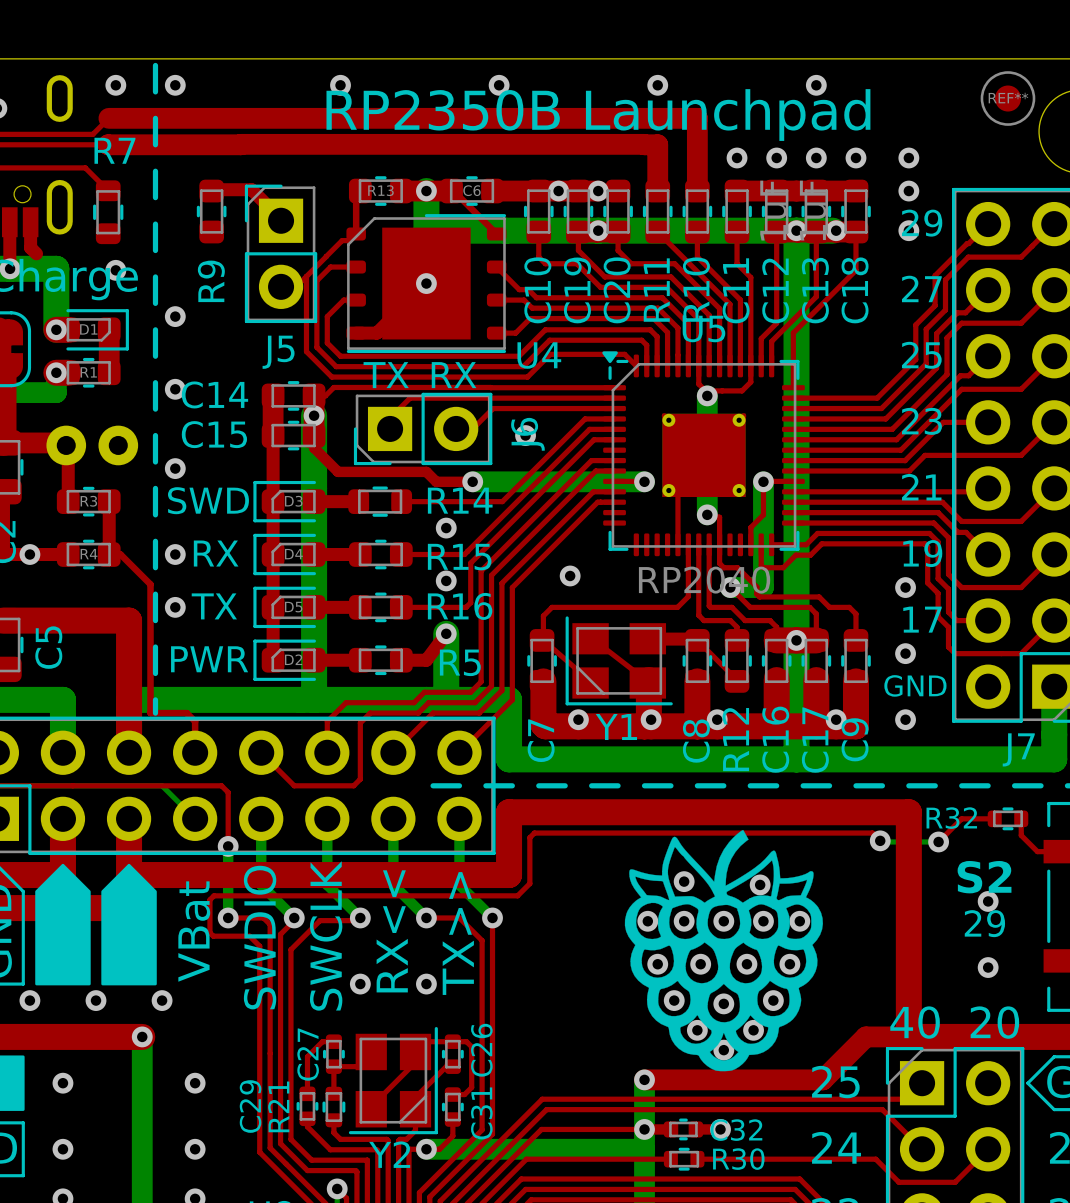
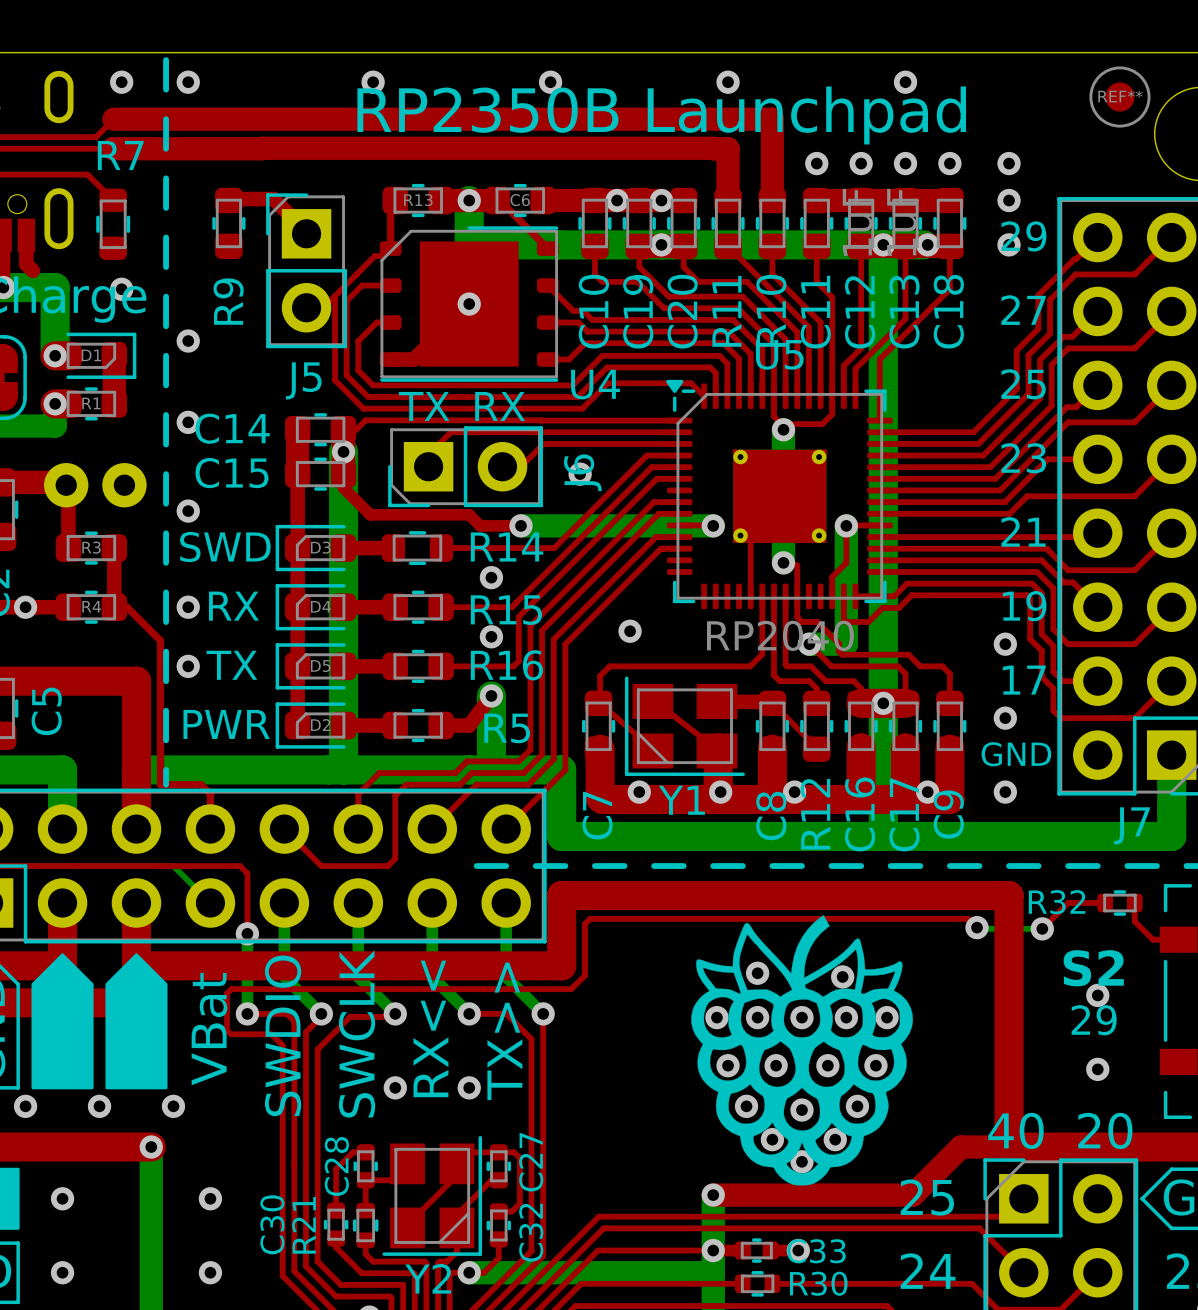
C26 name: C26 (481, 1050) -> C27 (531, 1162)
C27 name: C27 (308, 1054) -> C28 (336, 1166)
C29 name: C29 (250, 1106) -> C30 (272, 1224)
C31 name: C31 (481, 1113) -> C32 (531, 1232)
C32 name: C32 (736, 1130) -> C33 (816, 1251)

